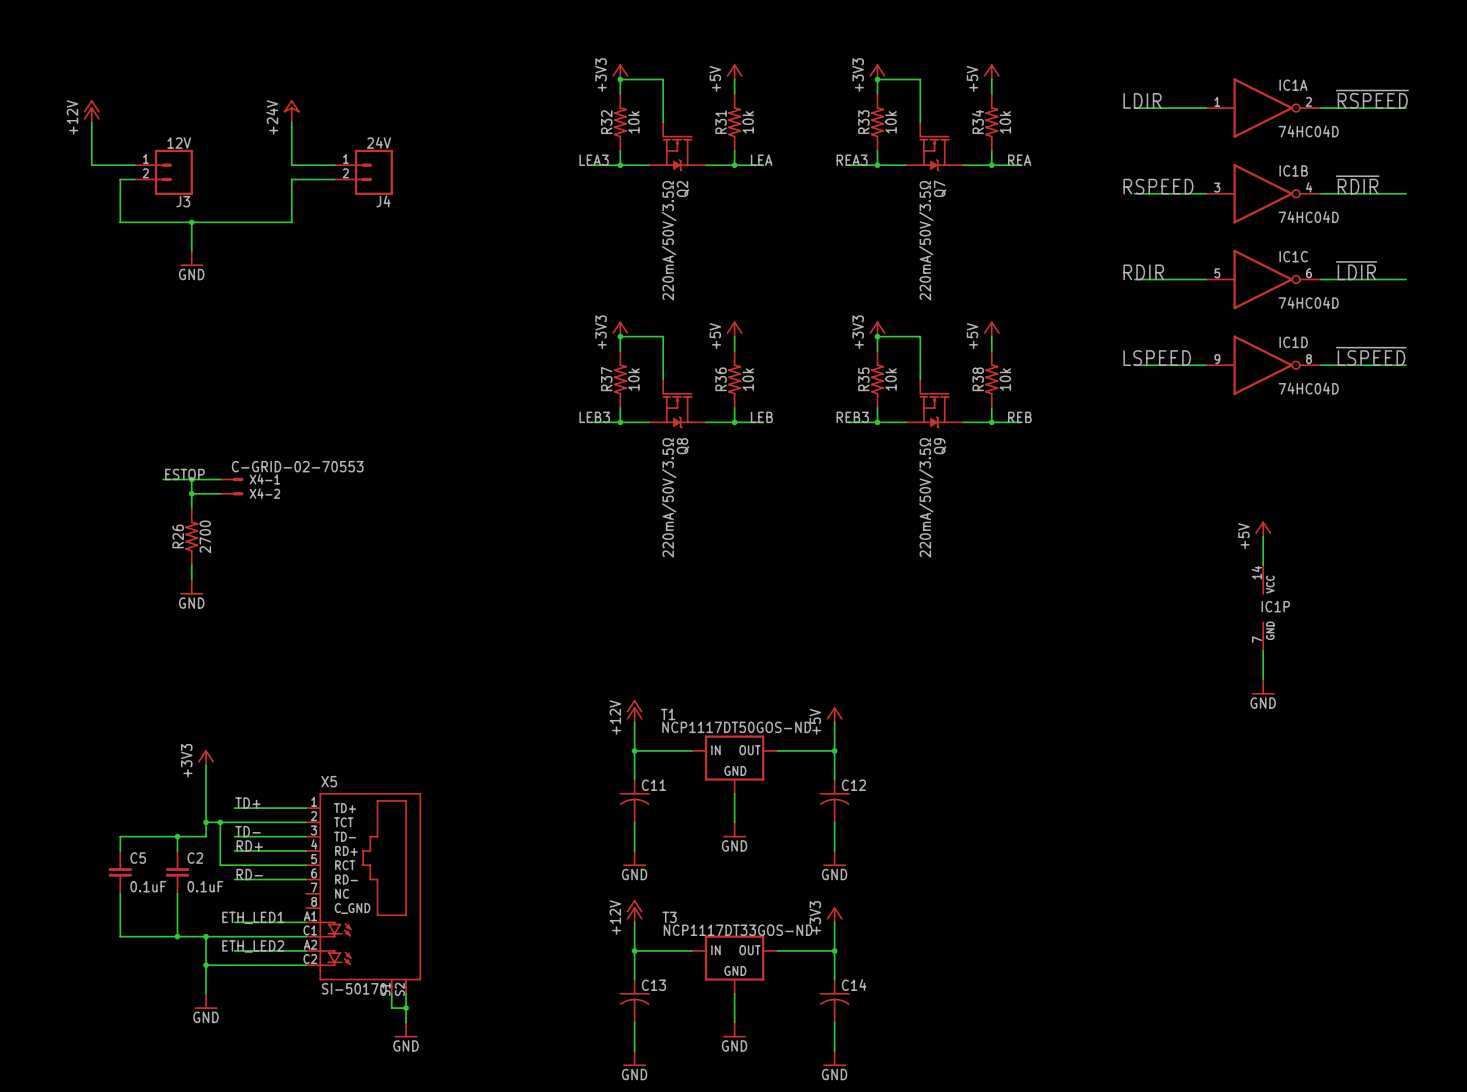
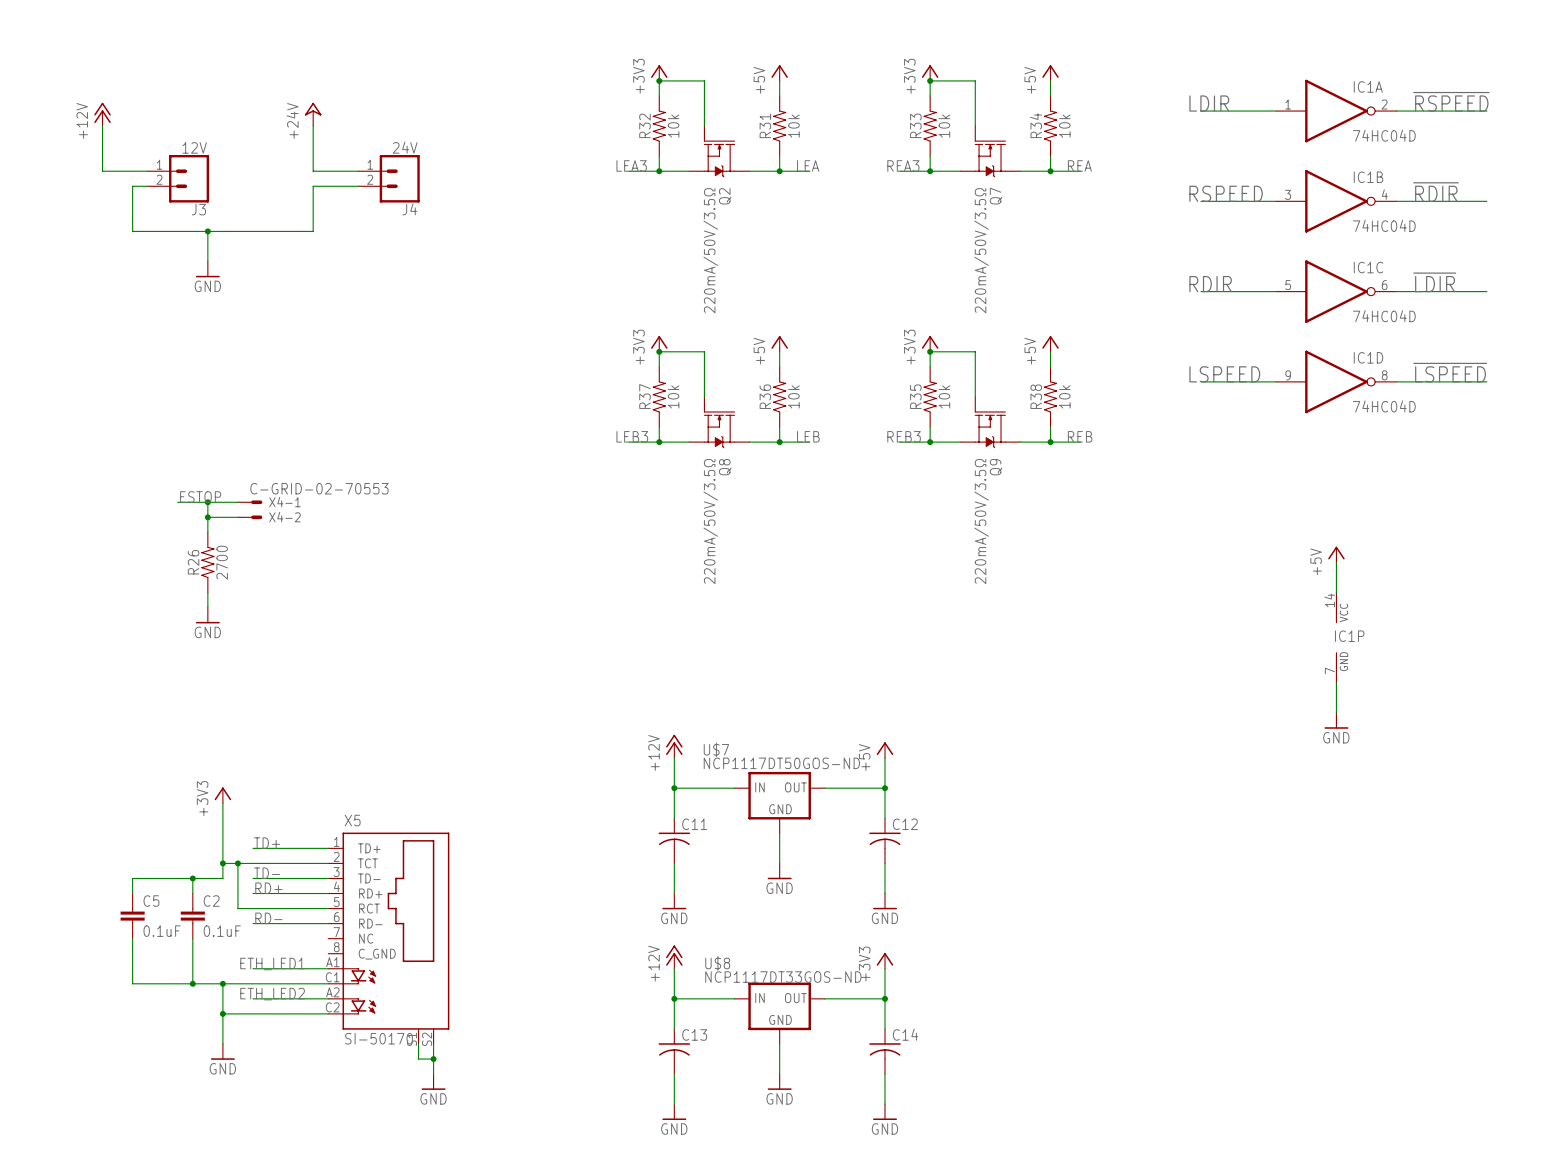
T1 name: T1 (668, 714) -> U$7 (716, 749)
T3 name: T3 (669, 917) -> U$8 (717, 963)

